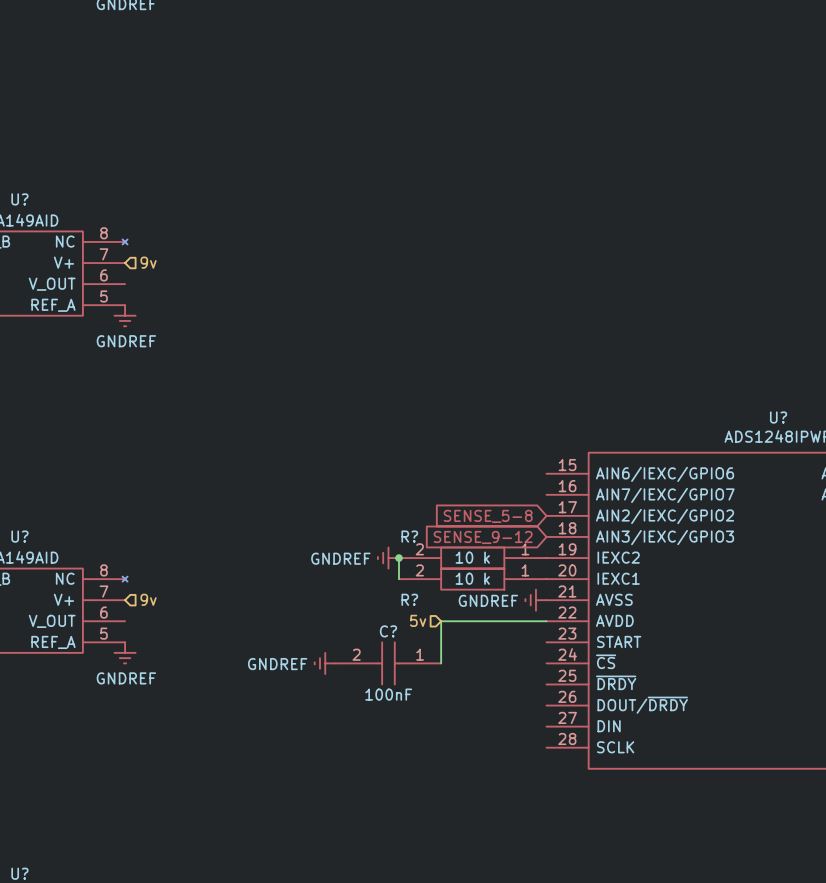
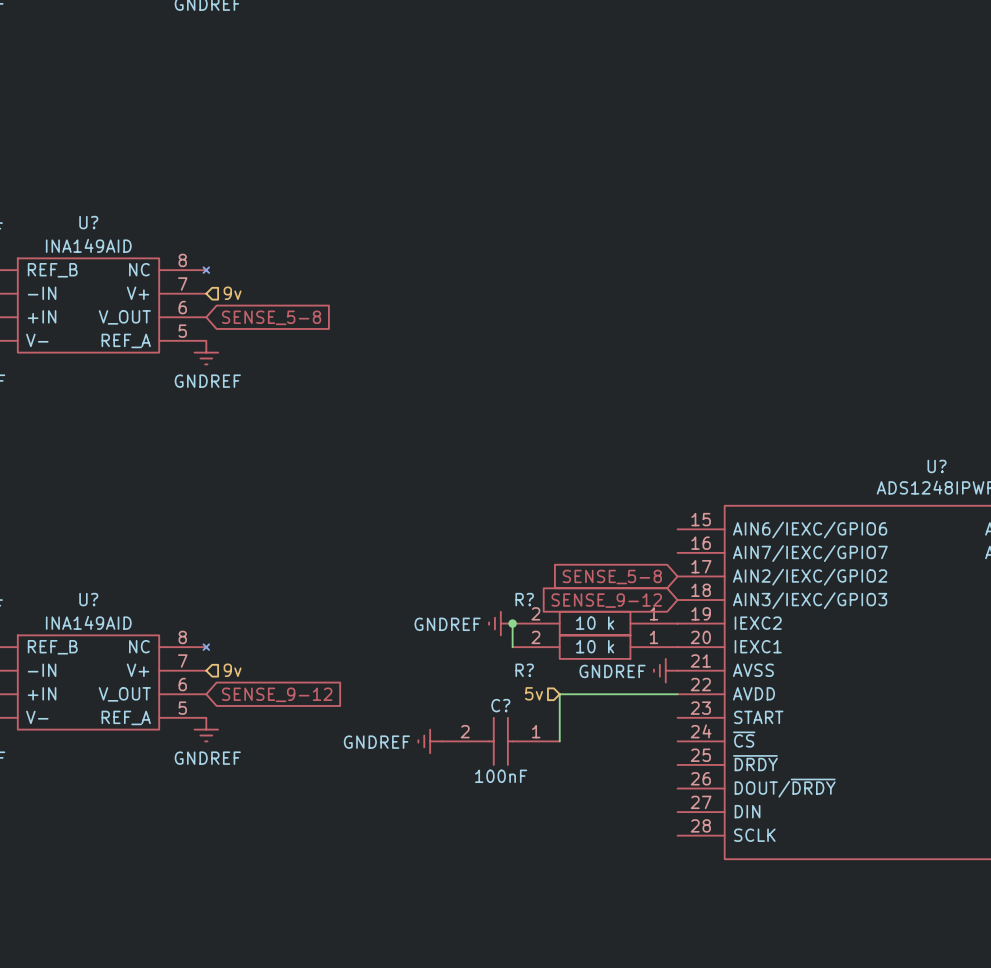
global label: none -> SENSE_5-8 (271, 317)
global label: none -> SENSE_9-12 (277, 694)

